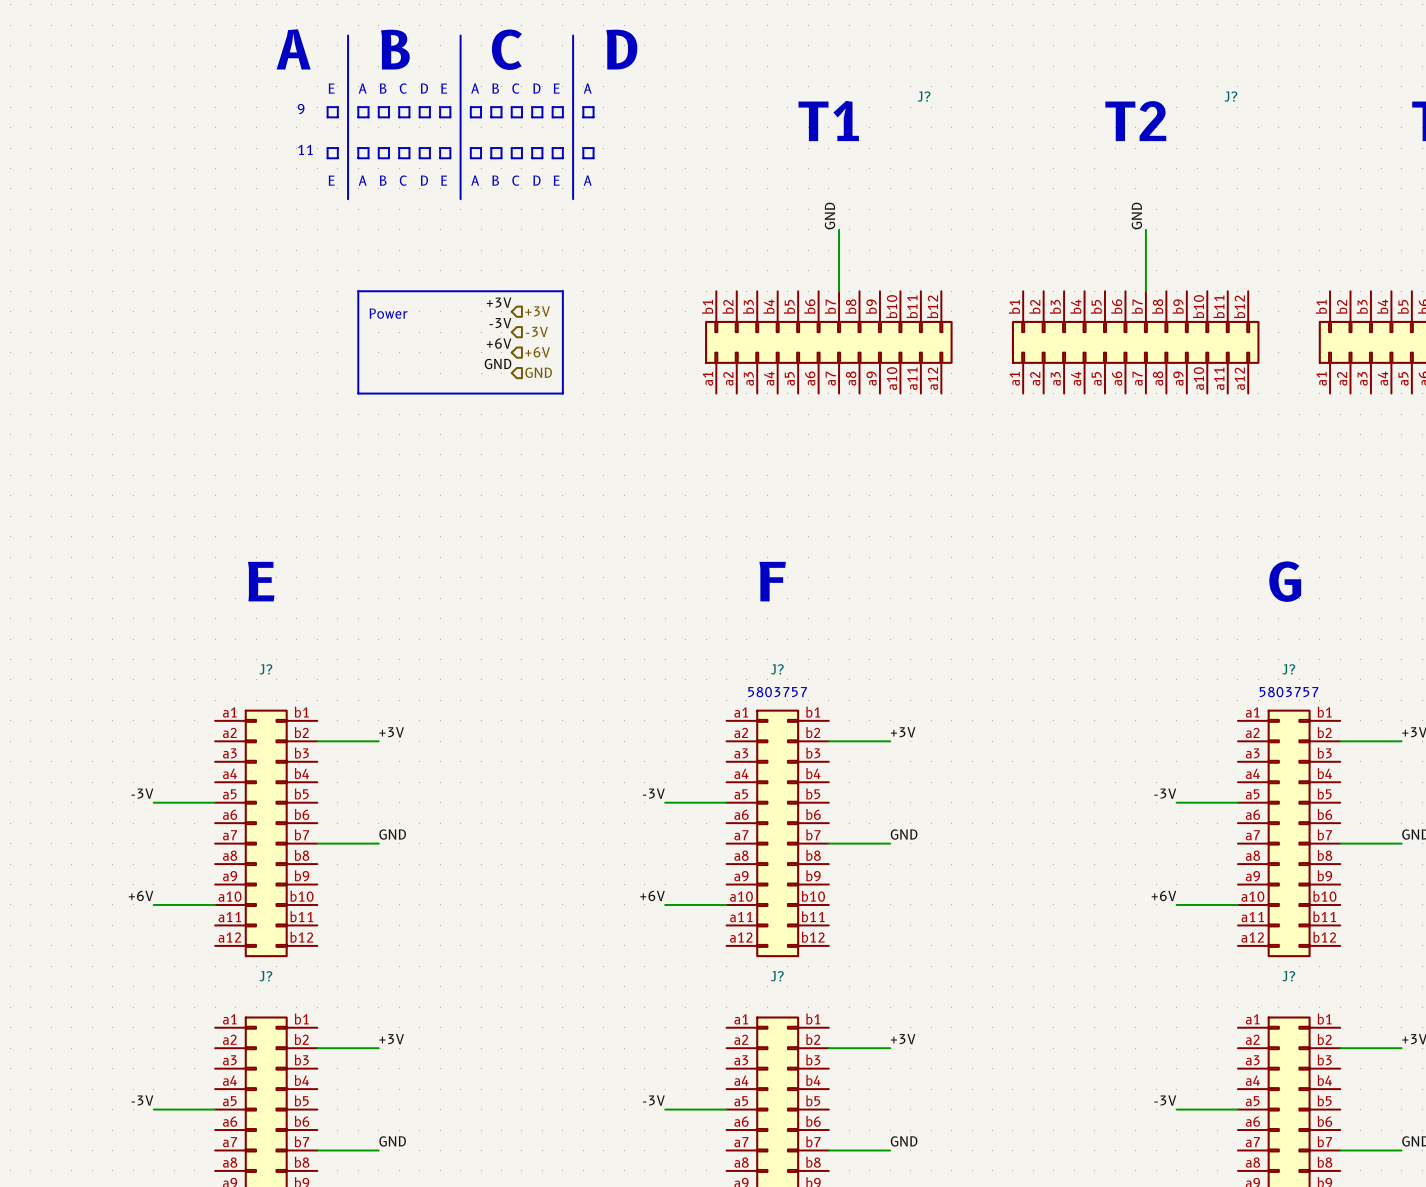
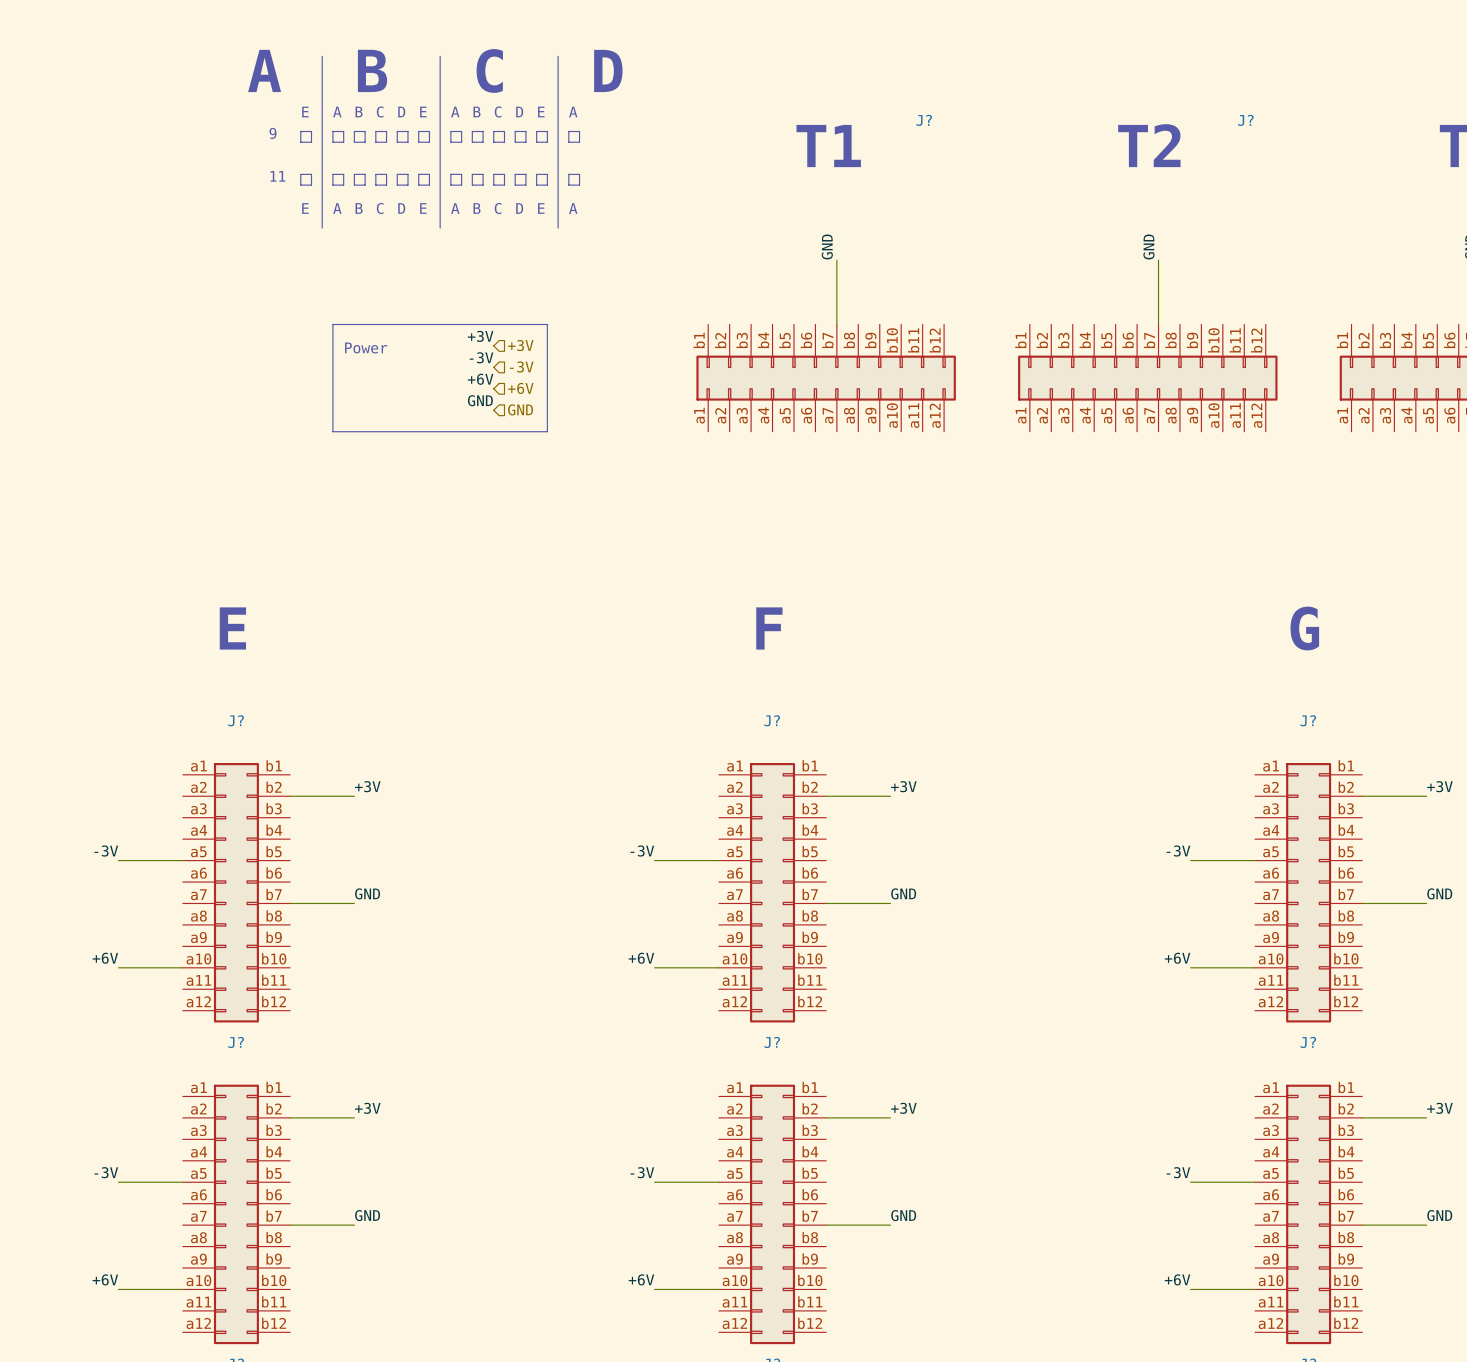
text: 5803757 (777, 692) -> none
text: 5803757 (1289, 692) -> none

